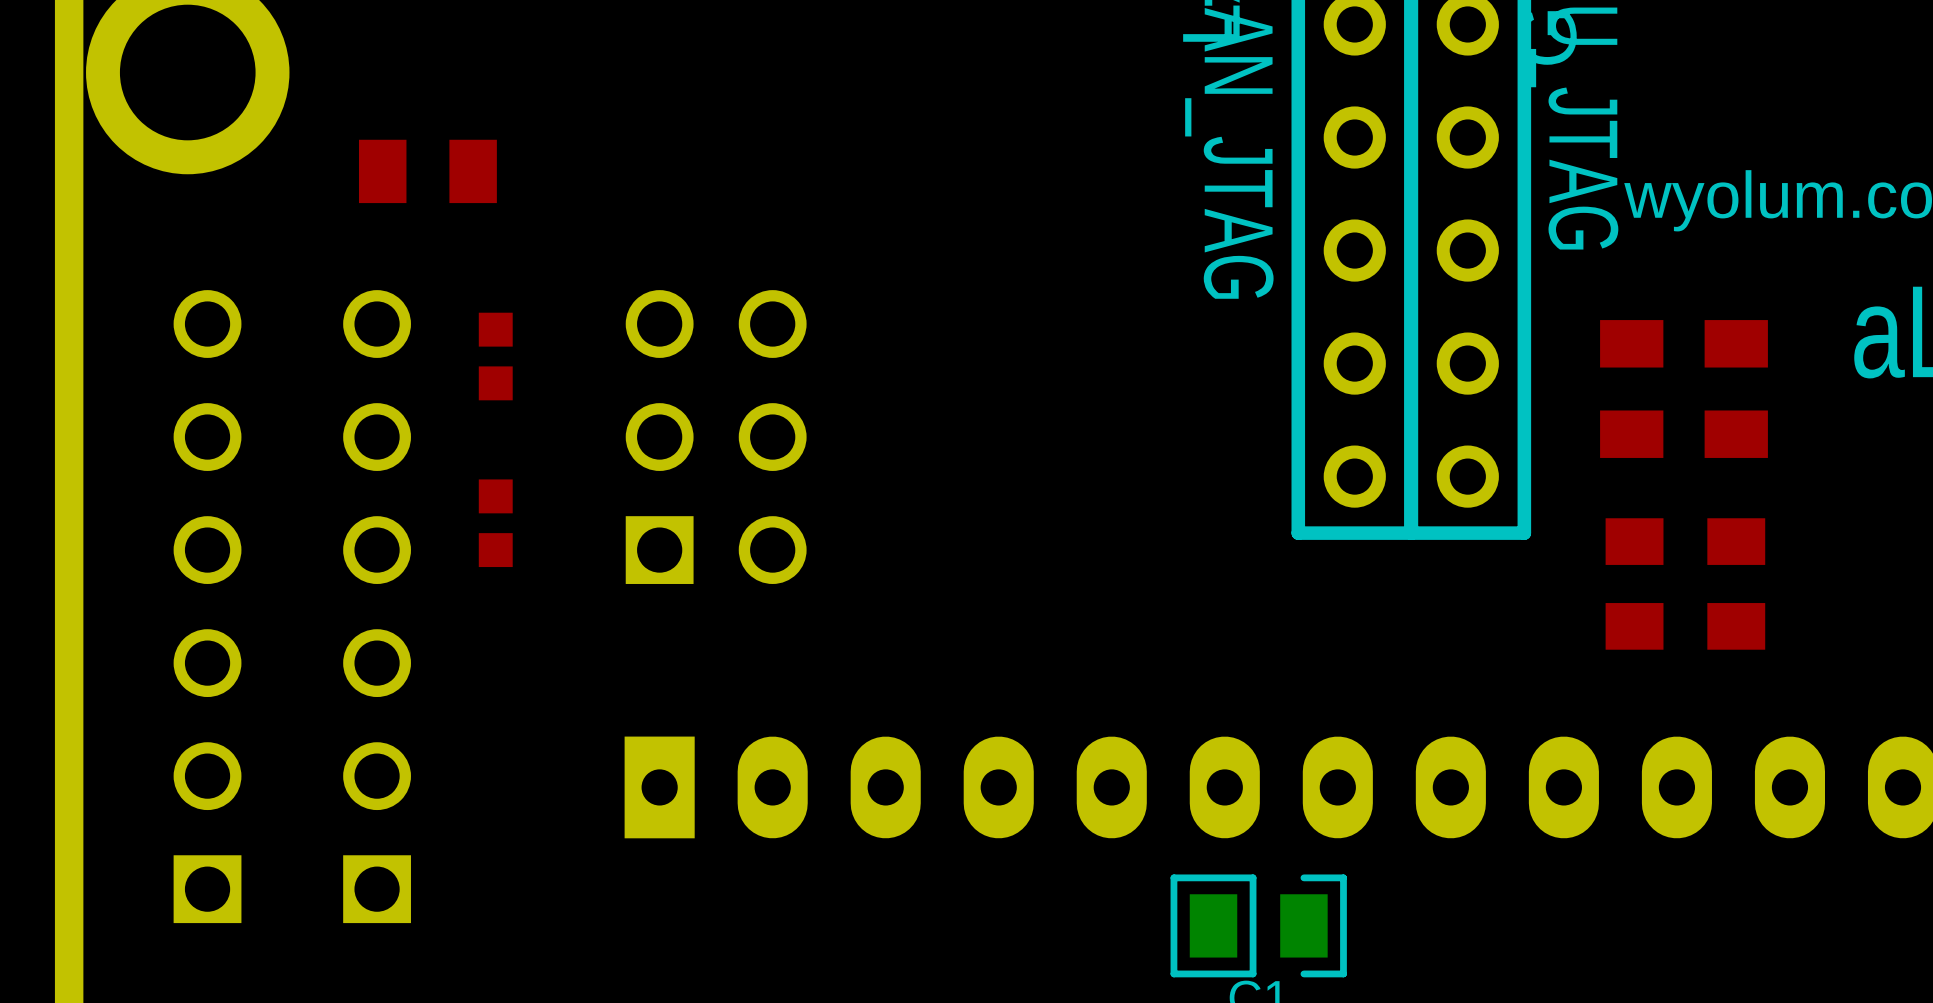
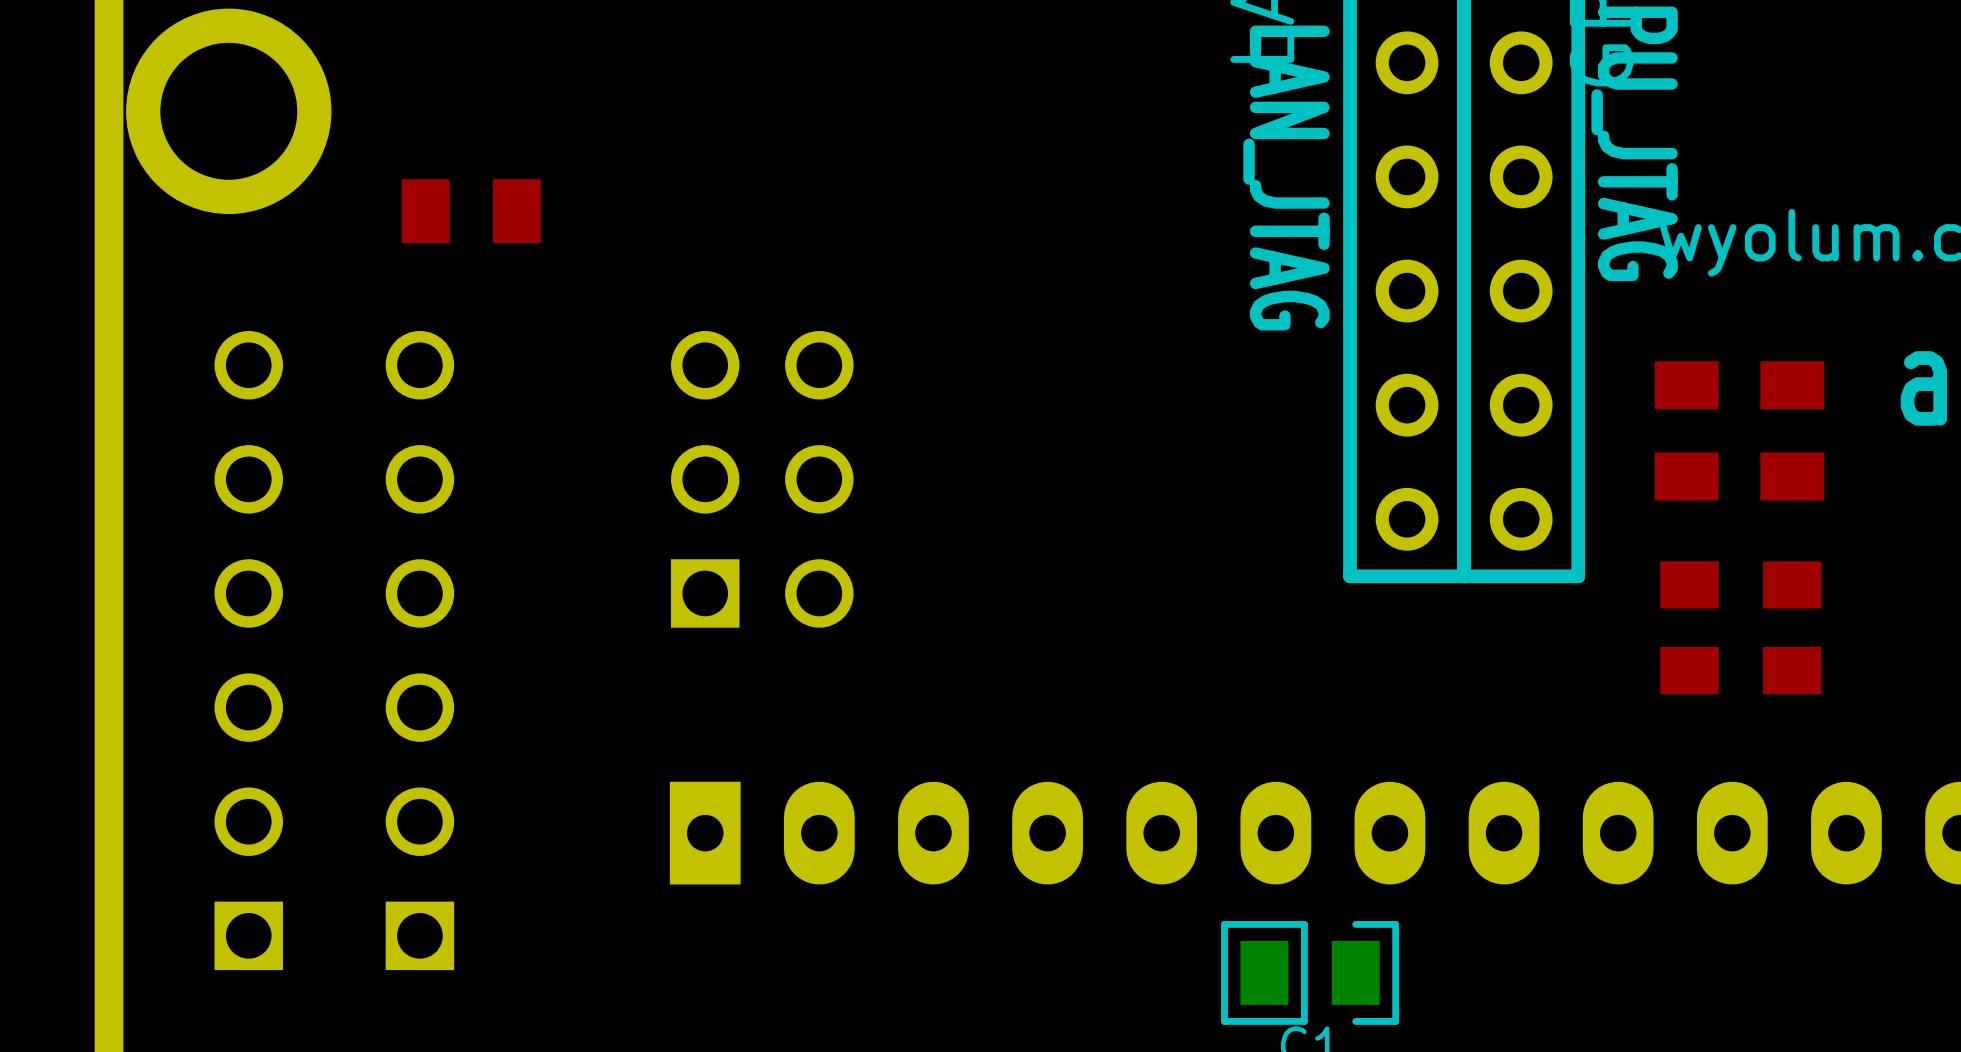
part: (495, 356) -> none
part: (495, 523) -> none

